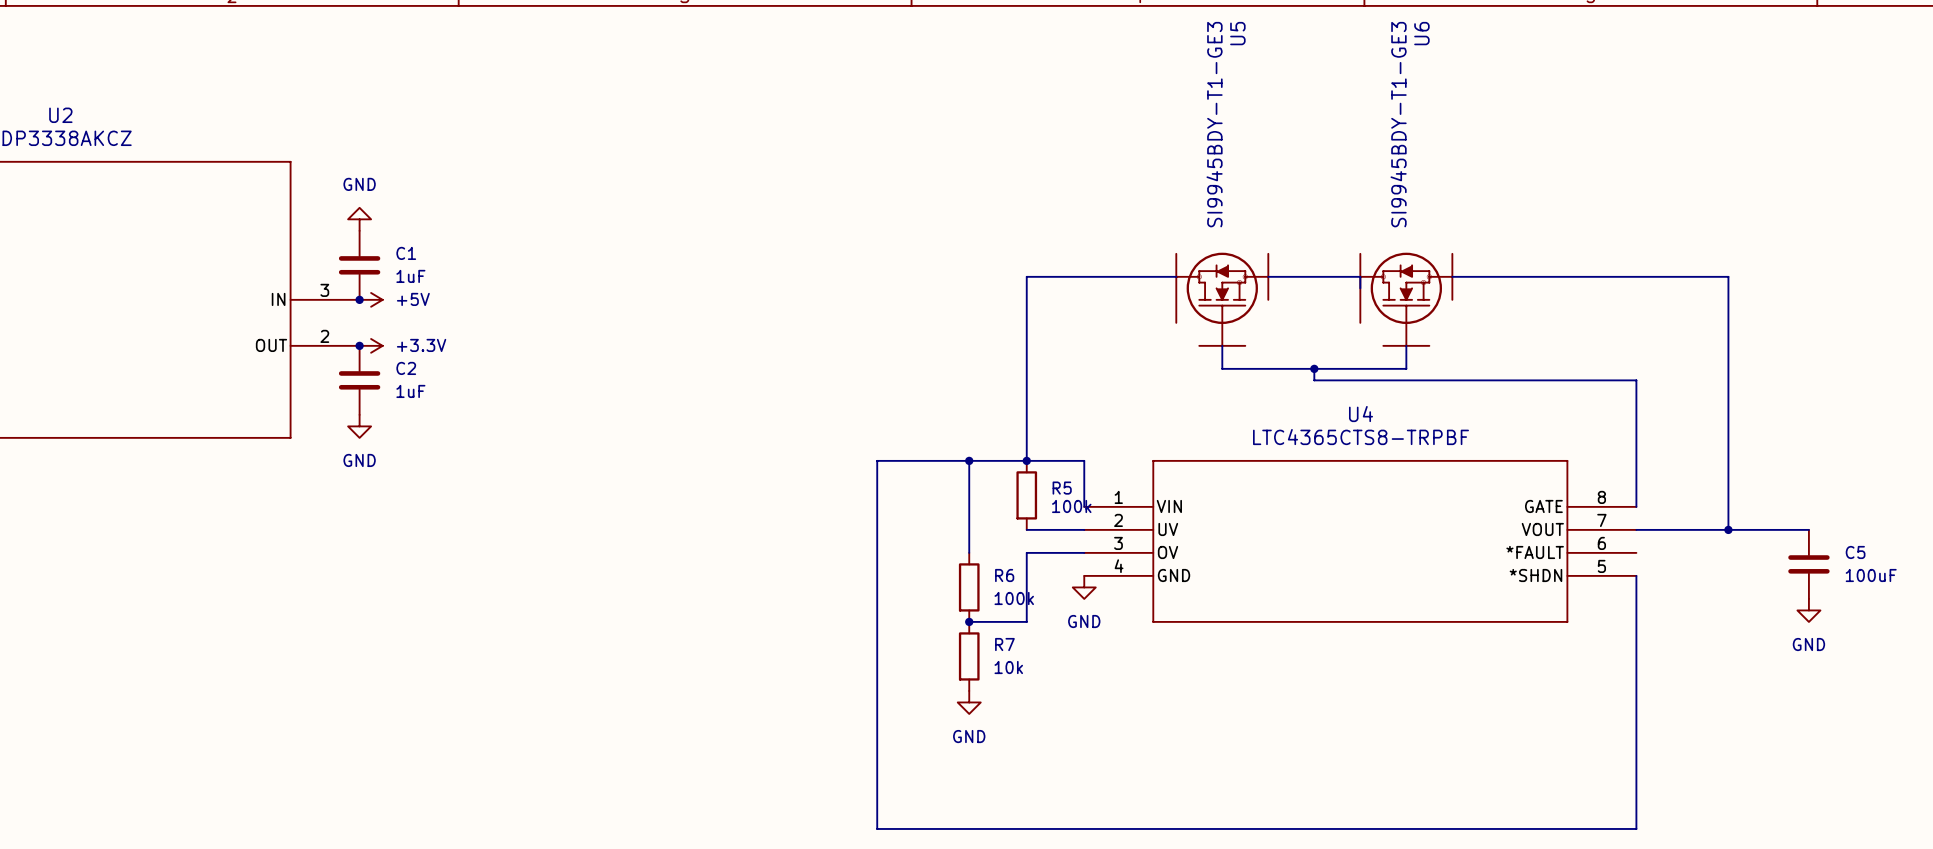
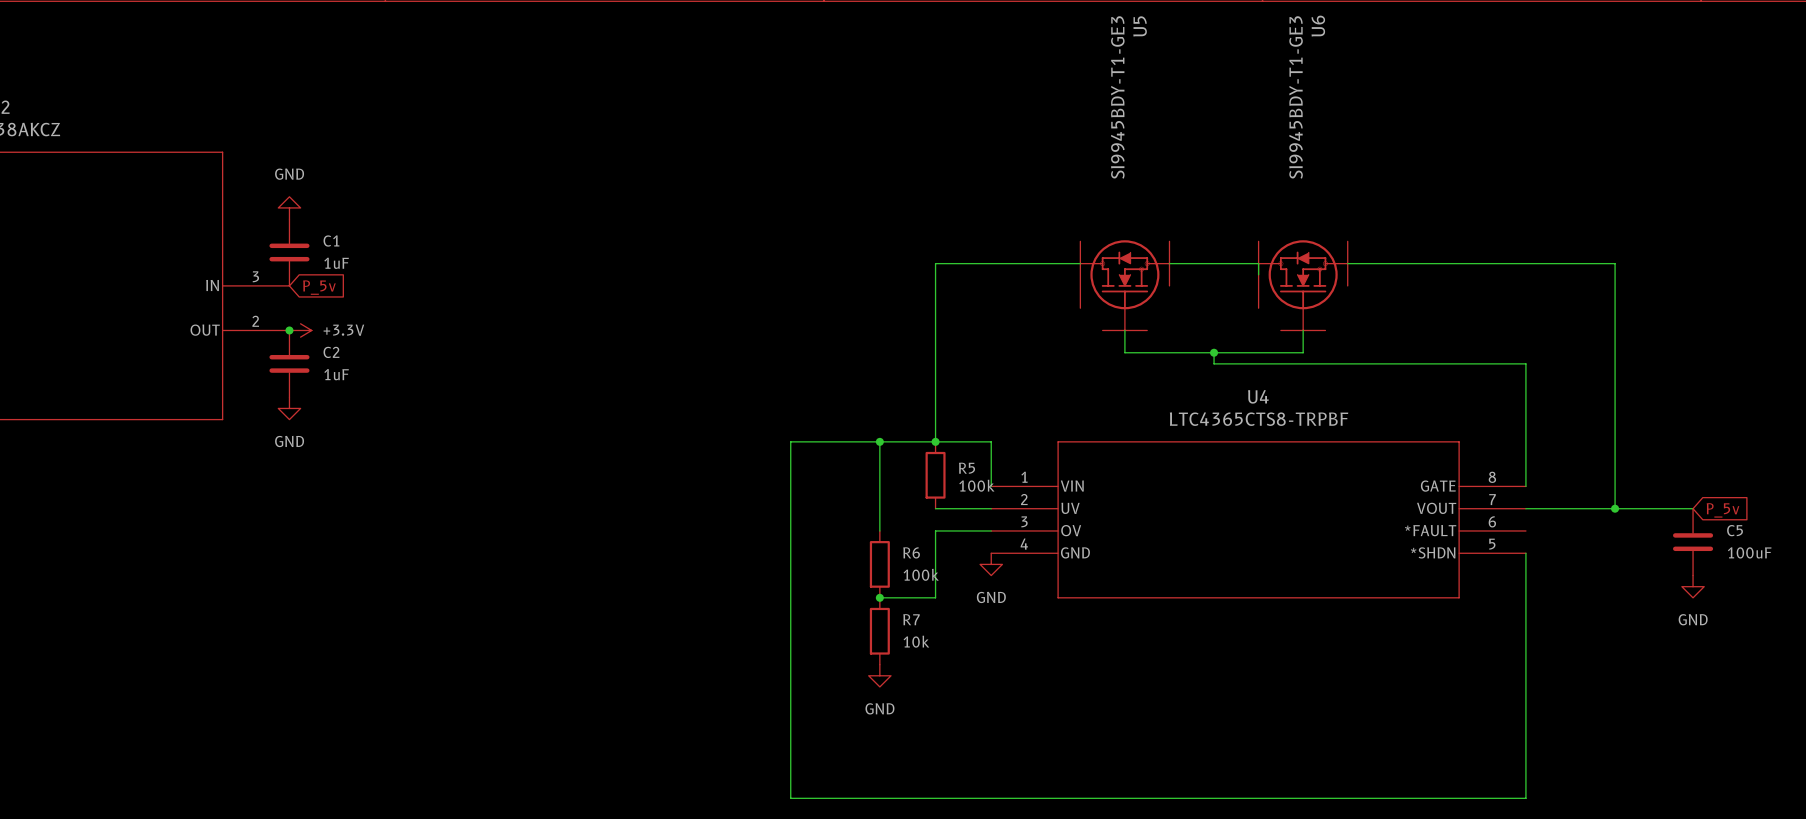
junction: (359, 299) -> none
power symbol: +5V (371, 299) -> none
global label: none -> P_5v (319, 287)
global label: none -> P_5v (1723, 510)

